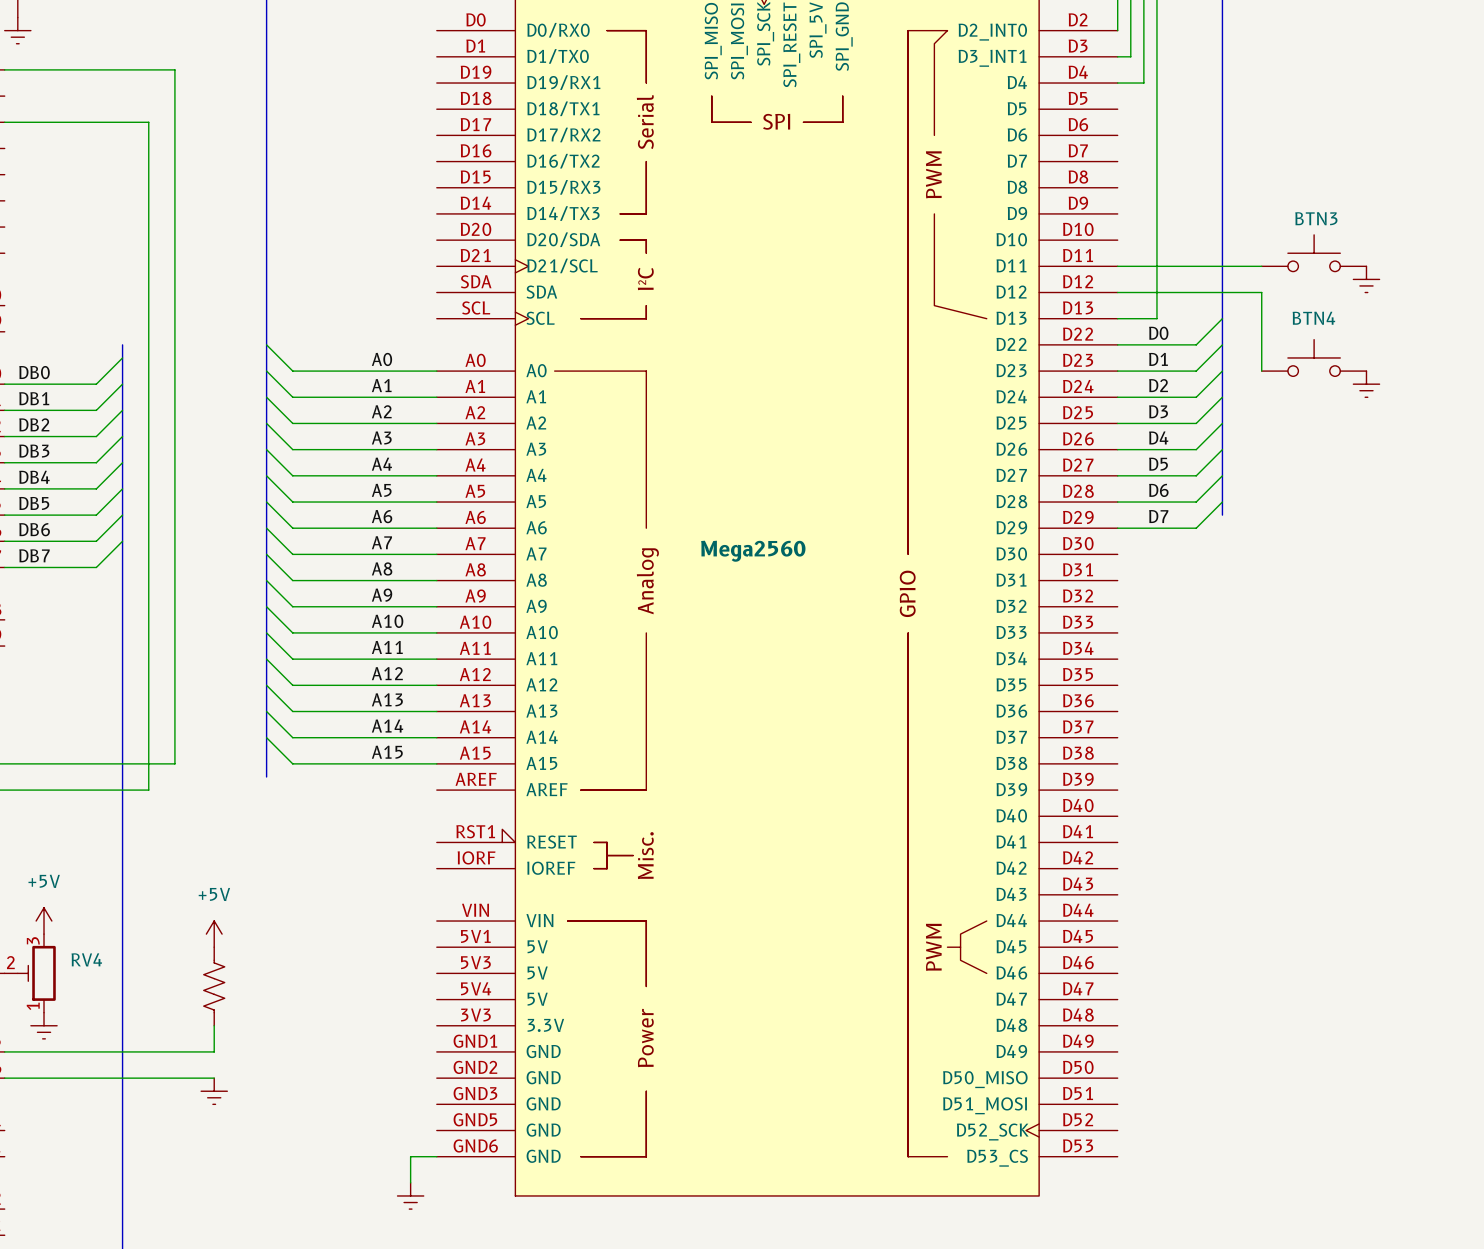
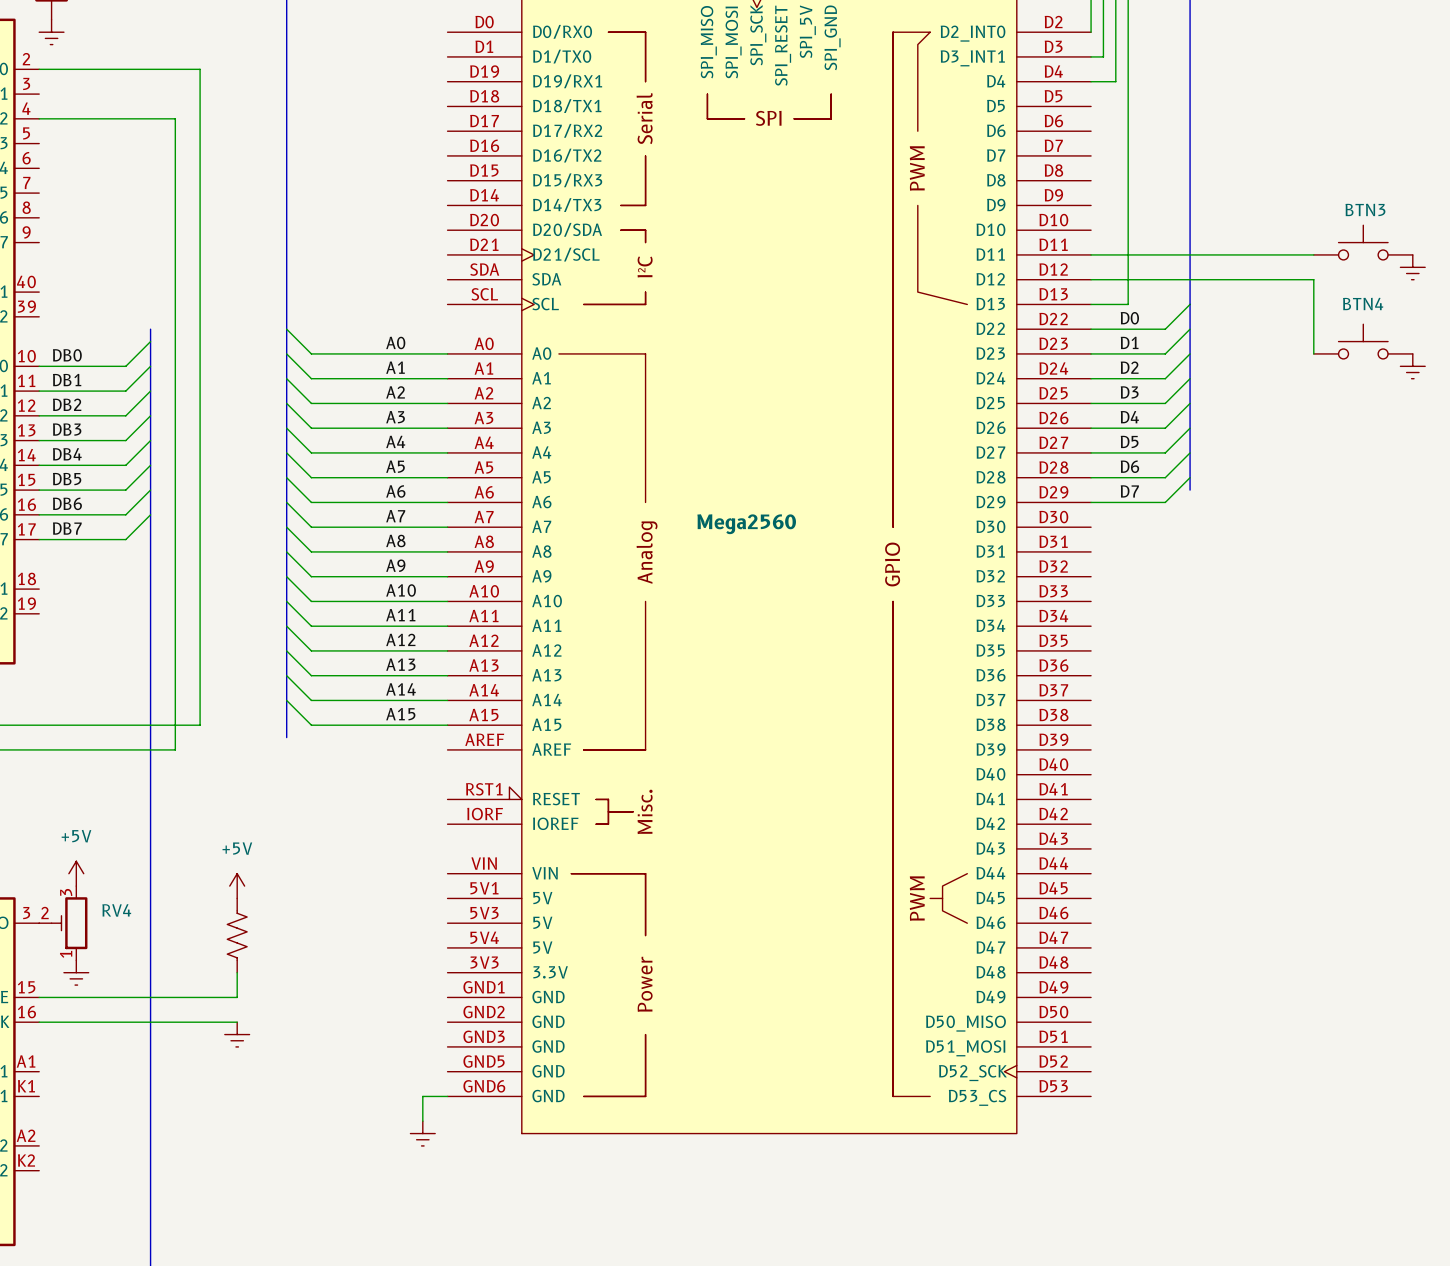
BTN3 position: (1314, 253) -> (1363, 242)
wire: none -> (1227, 254) (1313, 254)
power symbol: (1366, 279) -> none
power symbol: none -> (1412, 267)
wire: (1261, 292) (1261, 371) -> (1227, 279) (1313, 279) (1313, 353)
BTN4 position: (1314, 357) -> (1363, 341)
power symbol: (1366, 384) -> none
power symbol: none -> (1412, 366)

